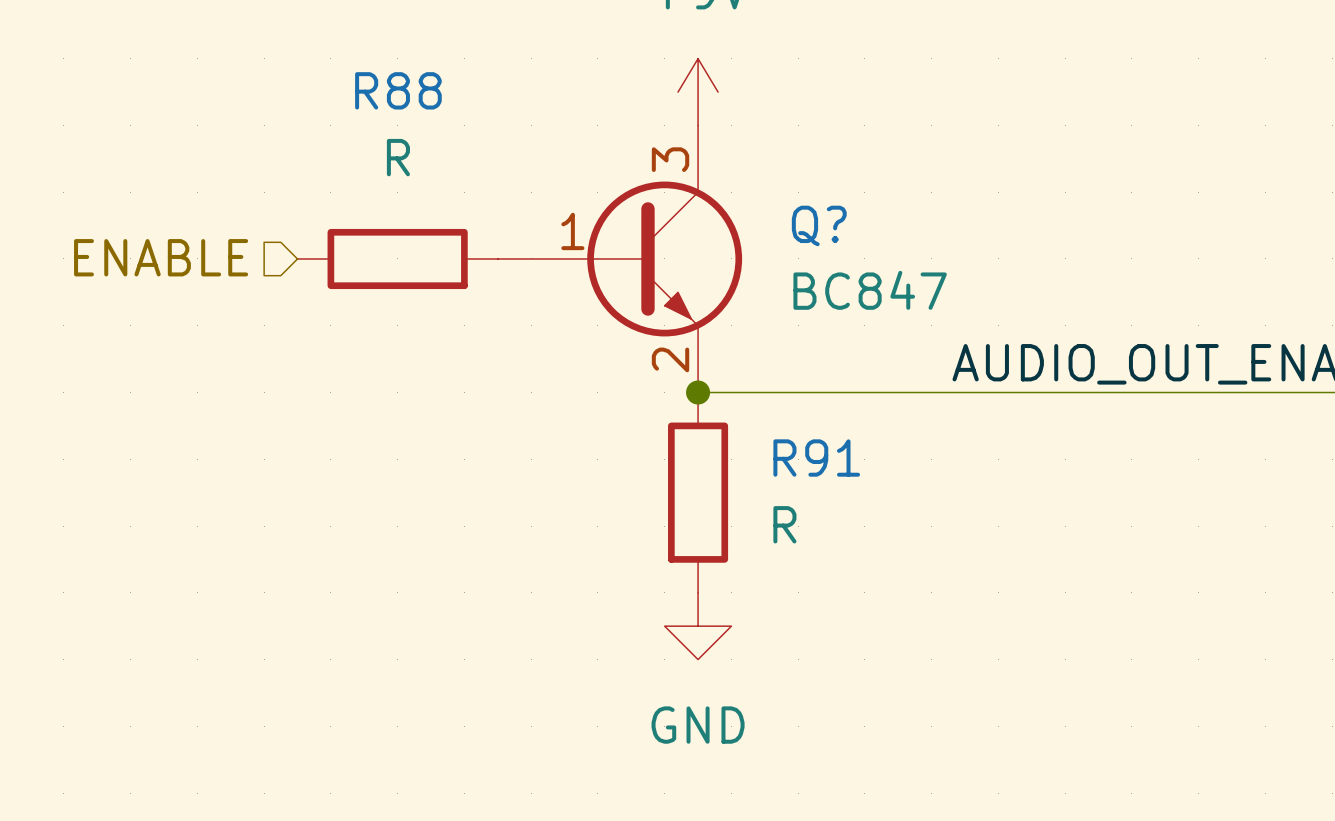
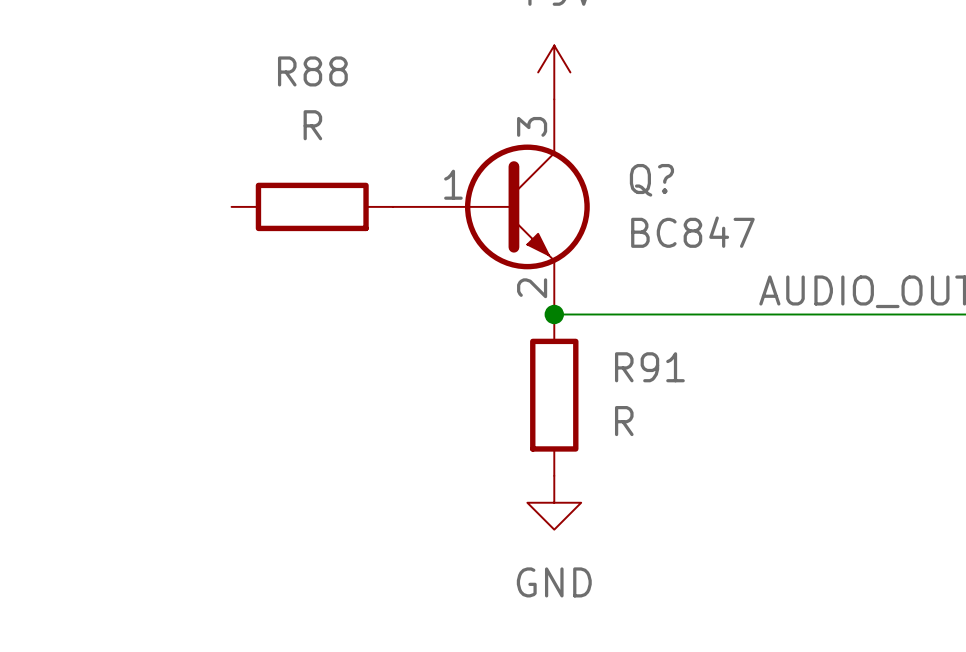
hierarchical label: ENABLE (161, 257) -> none

